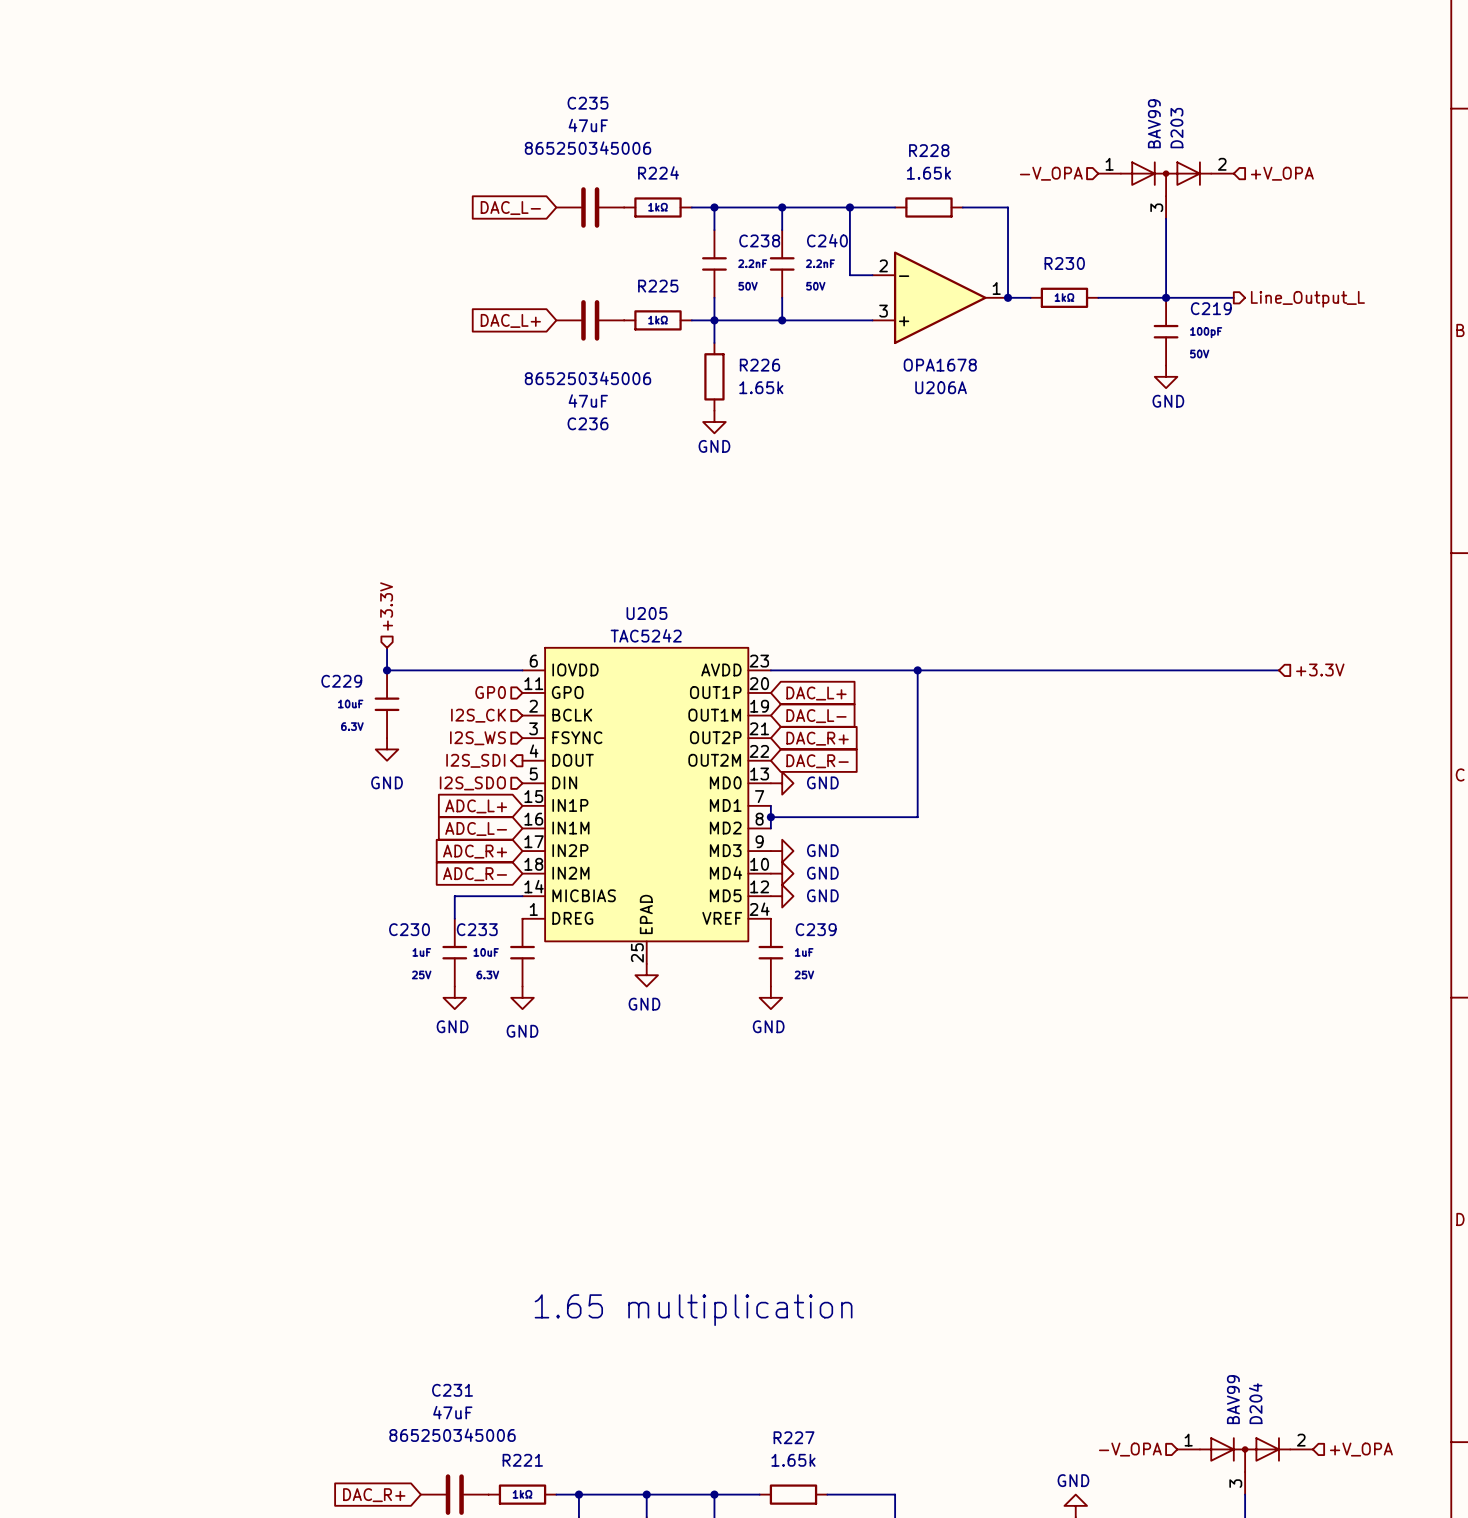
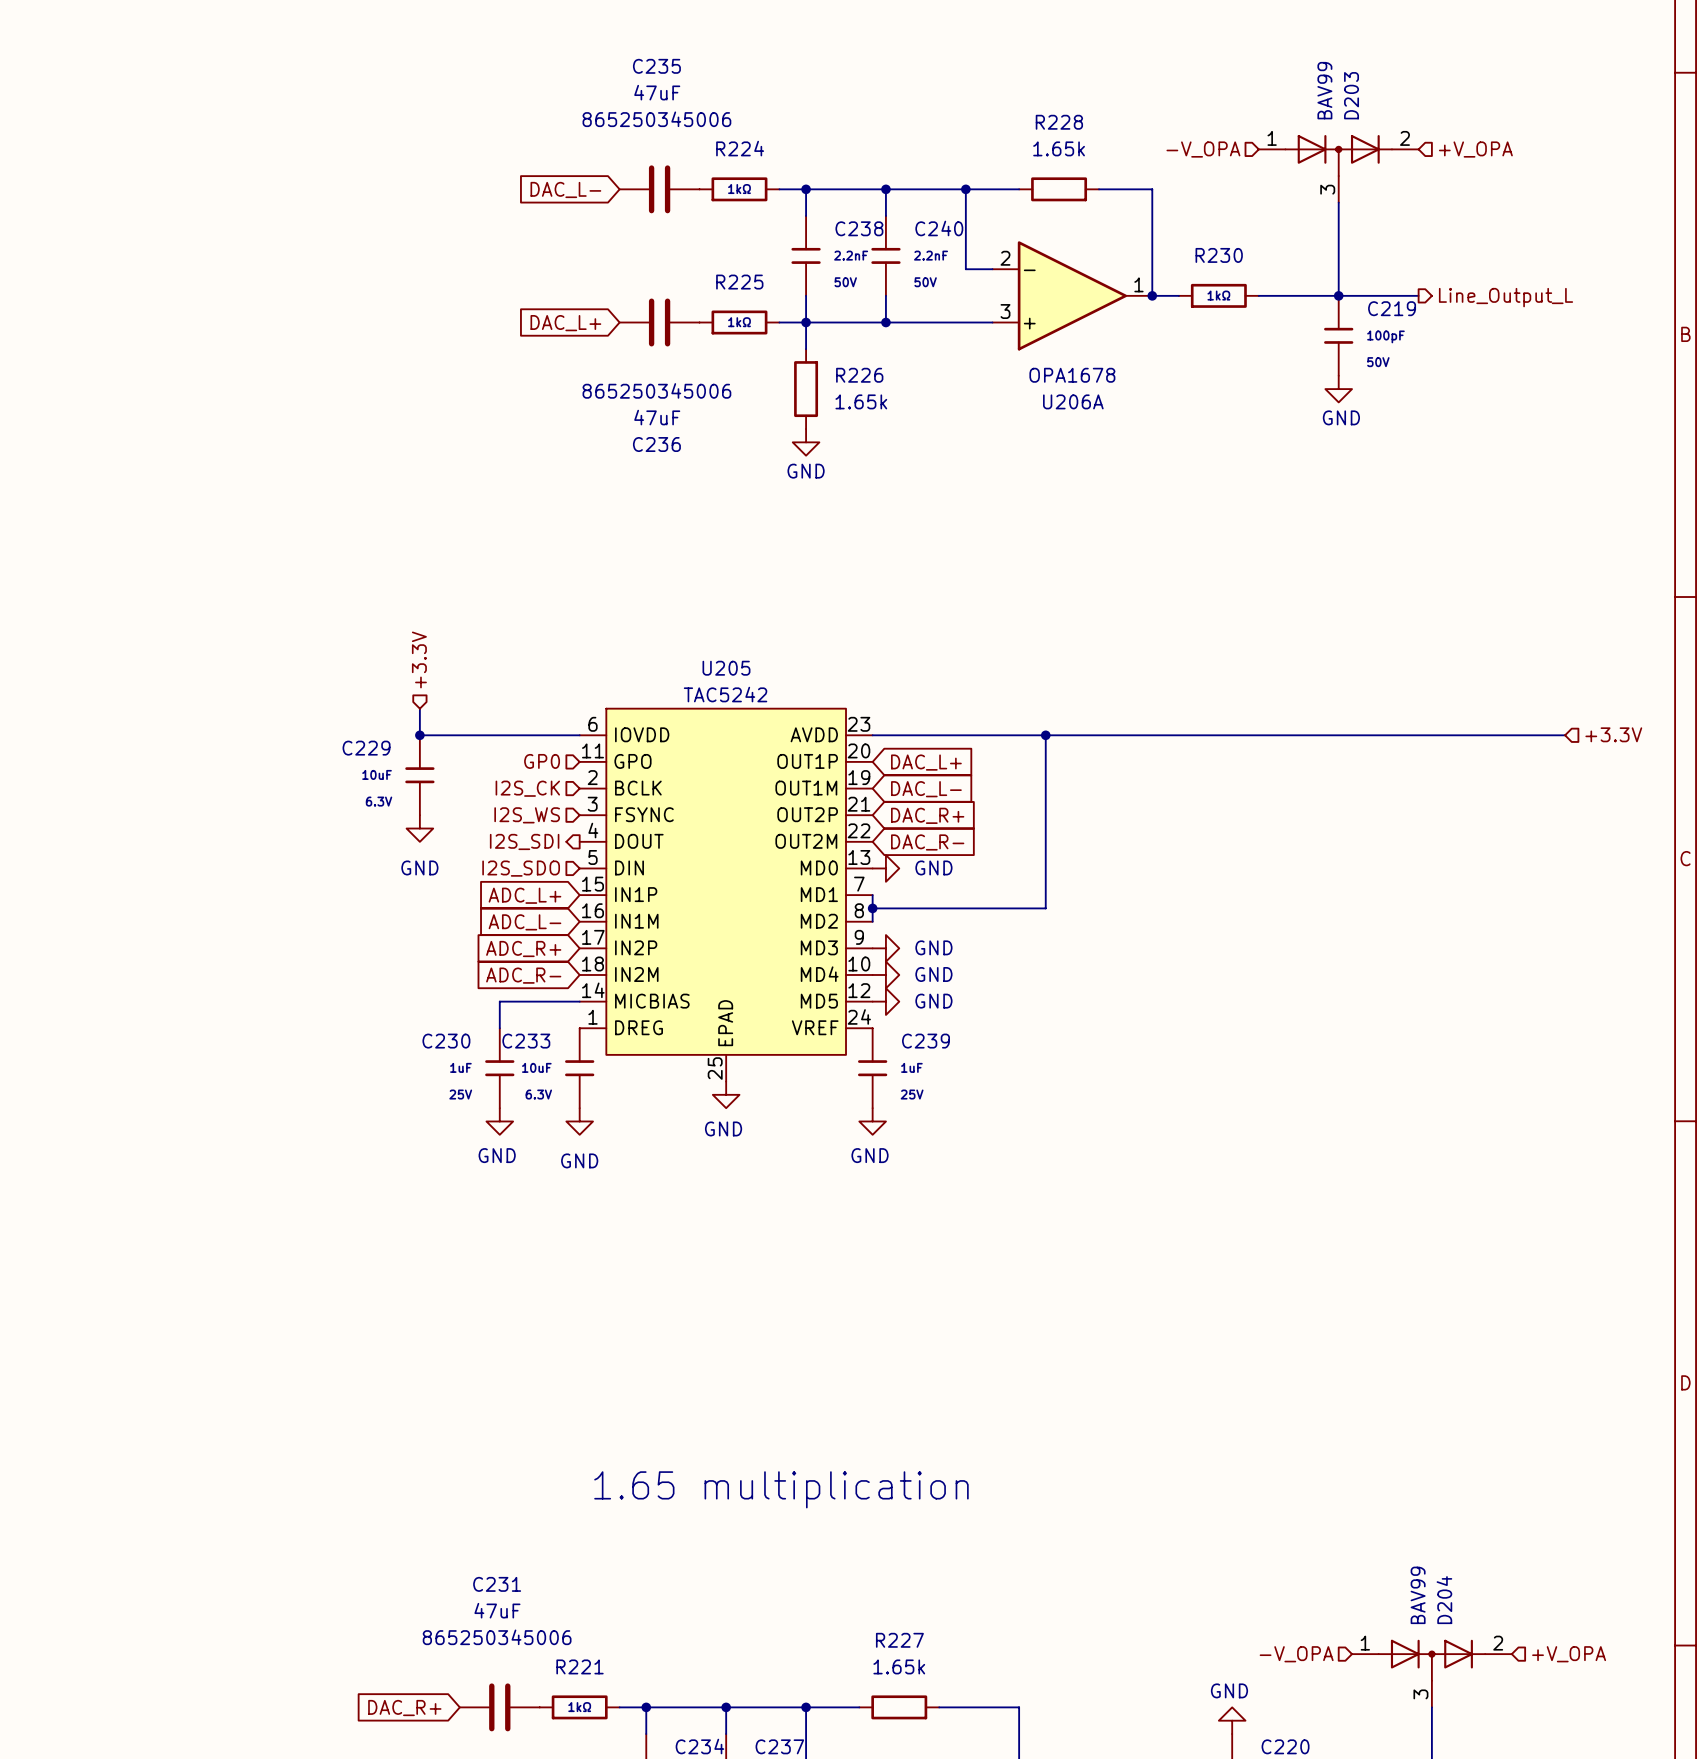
hierarchical label position: +3.3V (1320, 669) -> +3.3V (1613, 734)
wire: none -> (1471, 735) (1565, 735)

